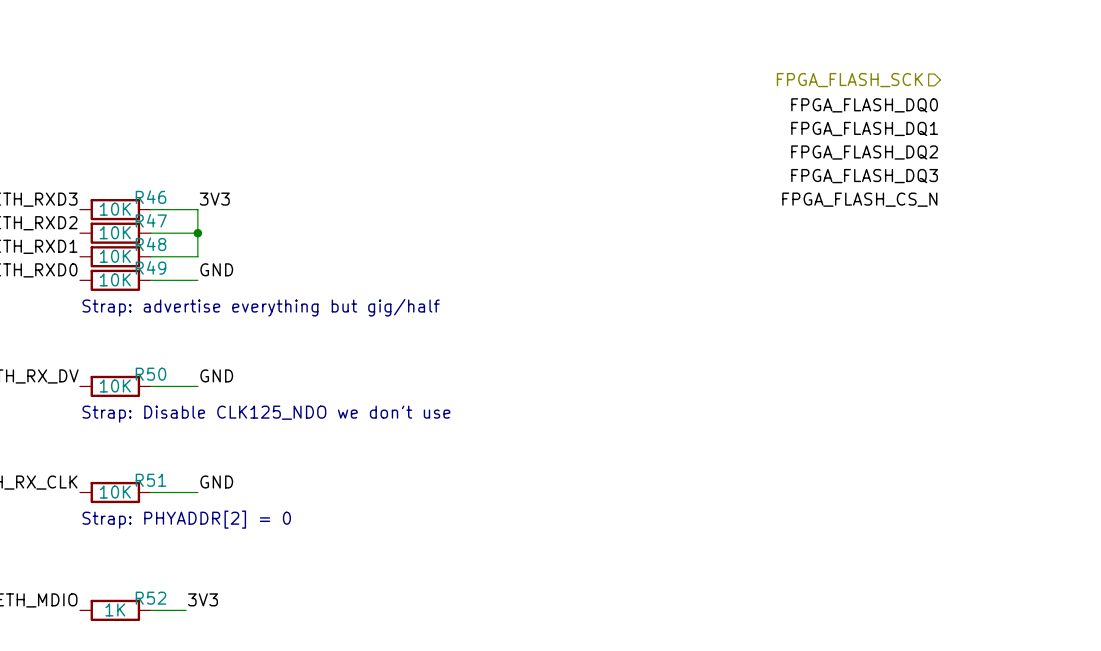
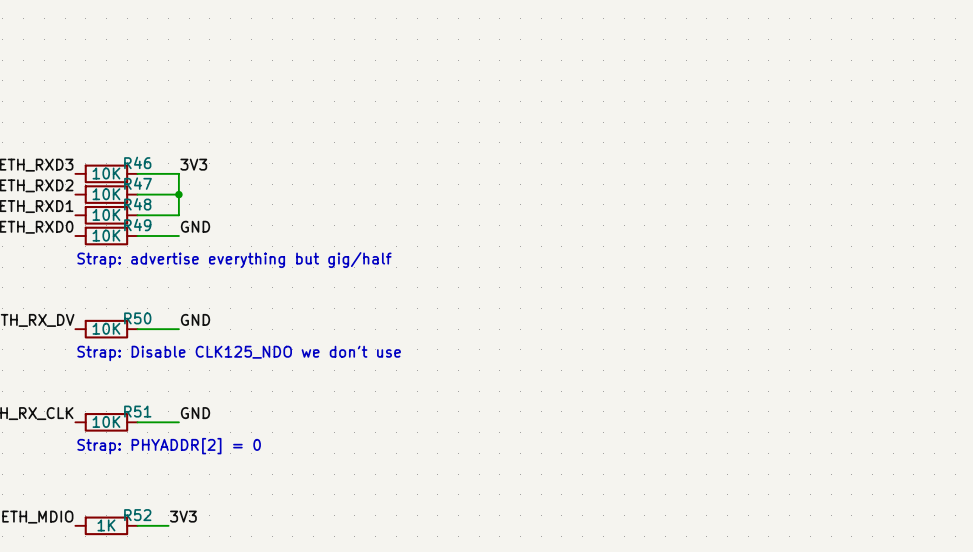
hierarchical label: FPGA_FLASH_SCK (849, 80) -> none
label: FPGA_FLASH_DQ0 (864, 105) -> none
label: FPGA_FLASH_DQ1 (864, 128) -> none
label: FPGA_FLASH_DQ2 (864, 152) -> none
label: FPGA_FLASH_DQ3 (864, 176) -> none
label: FPGA_FLASH_CS_N (859, 199) -> none

